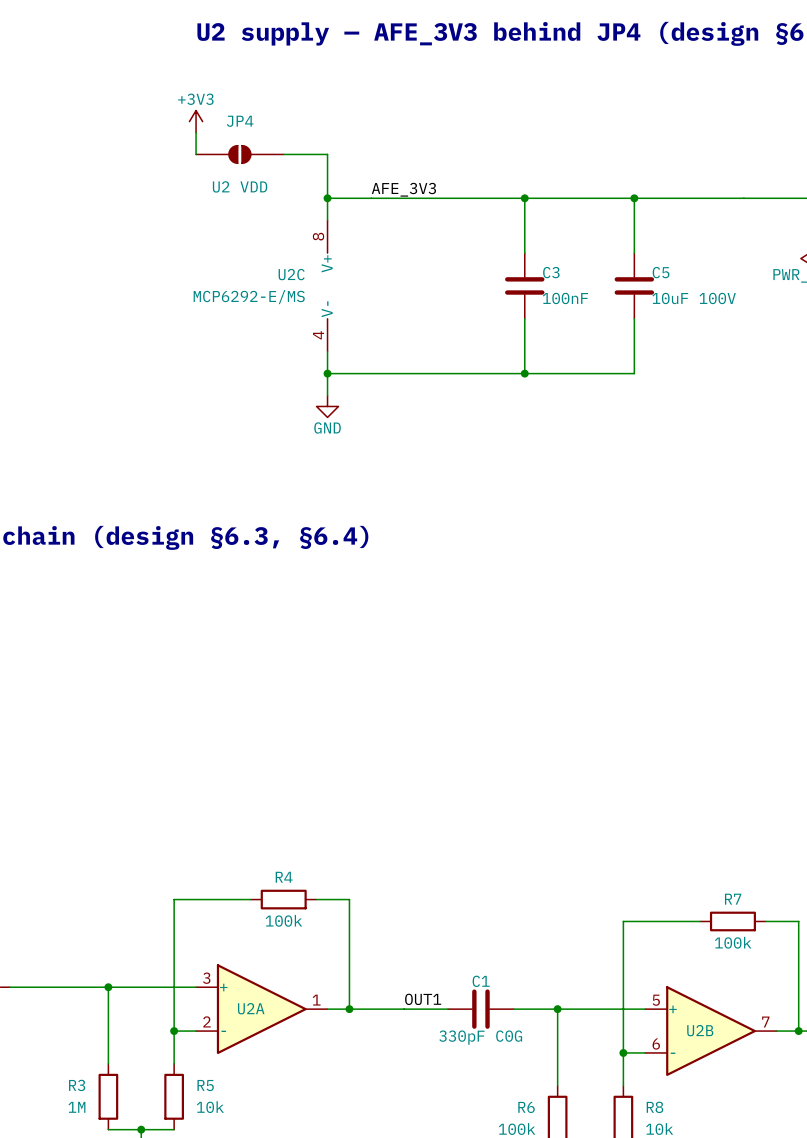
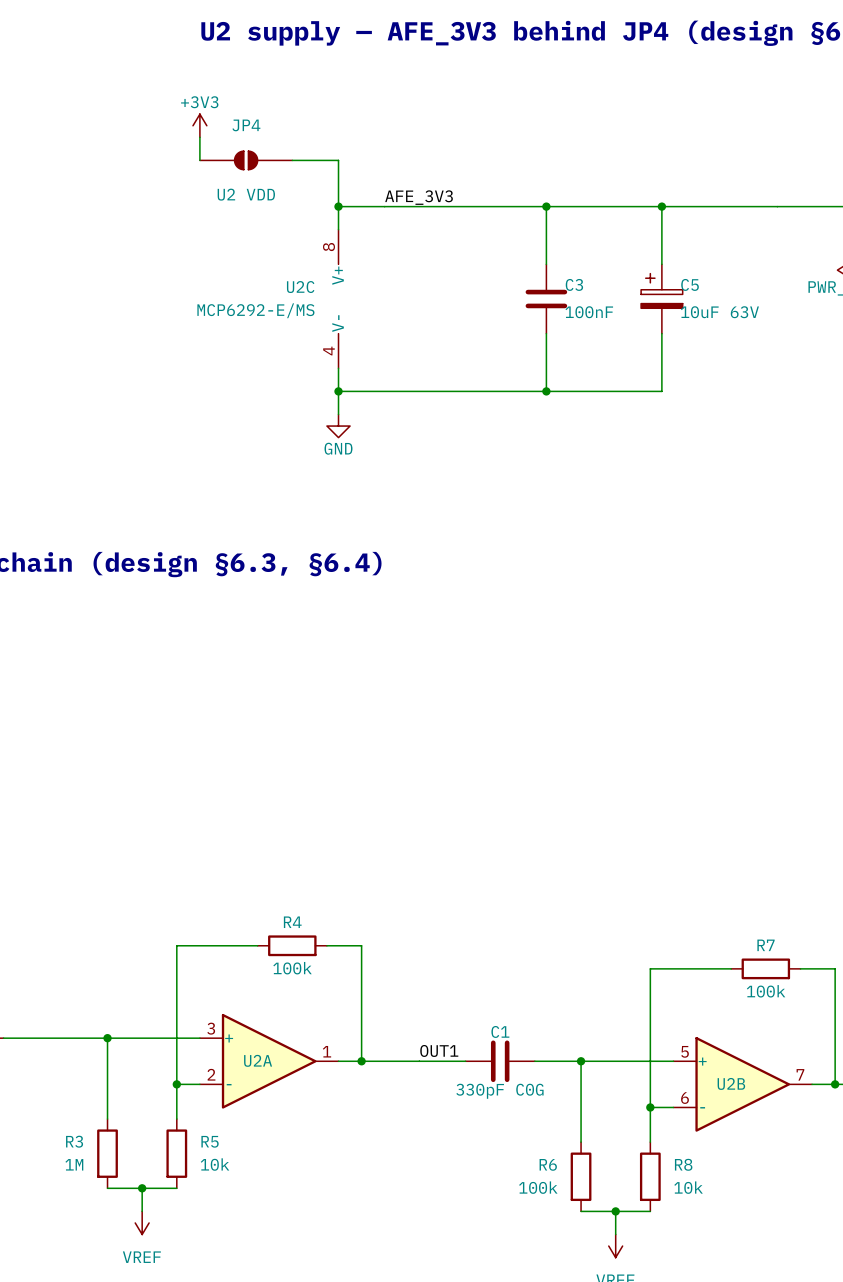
C5 symbol: [614, 253, 655, 319] -> [641, 264, 683, 334]
C5 value: 10uF 100V (694, 298) -> 10uF 63V (719, 312)

